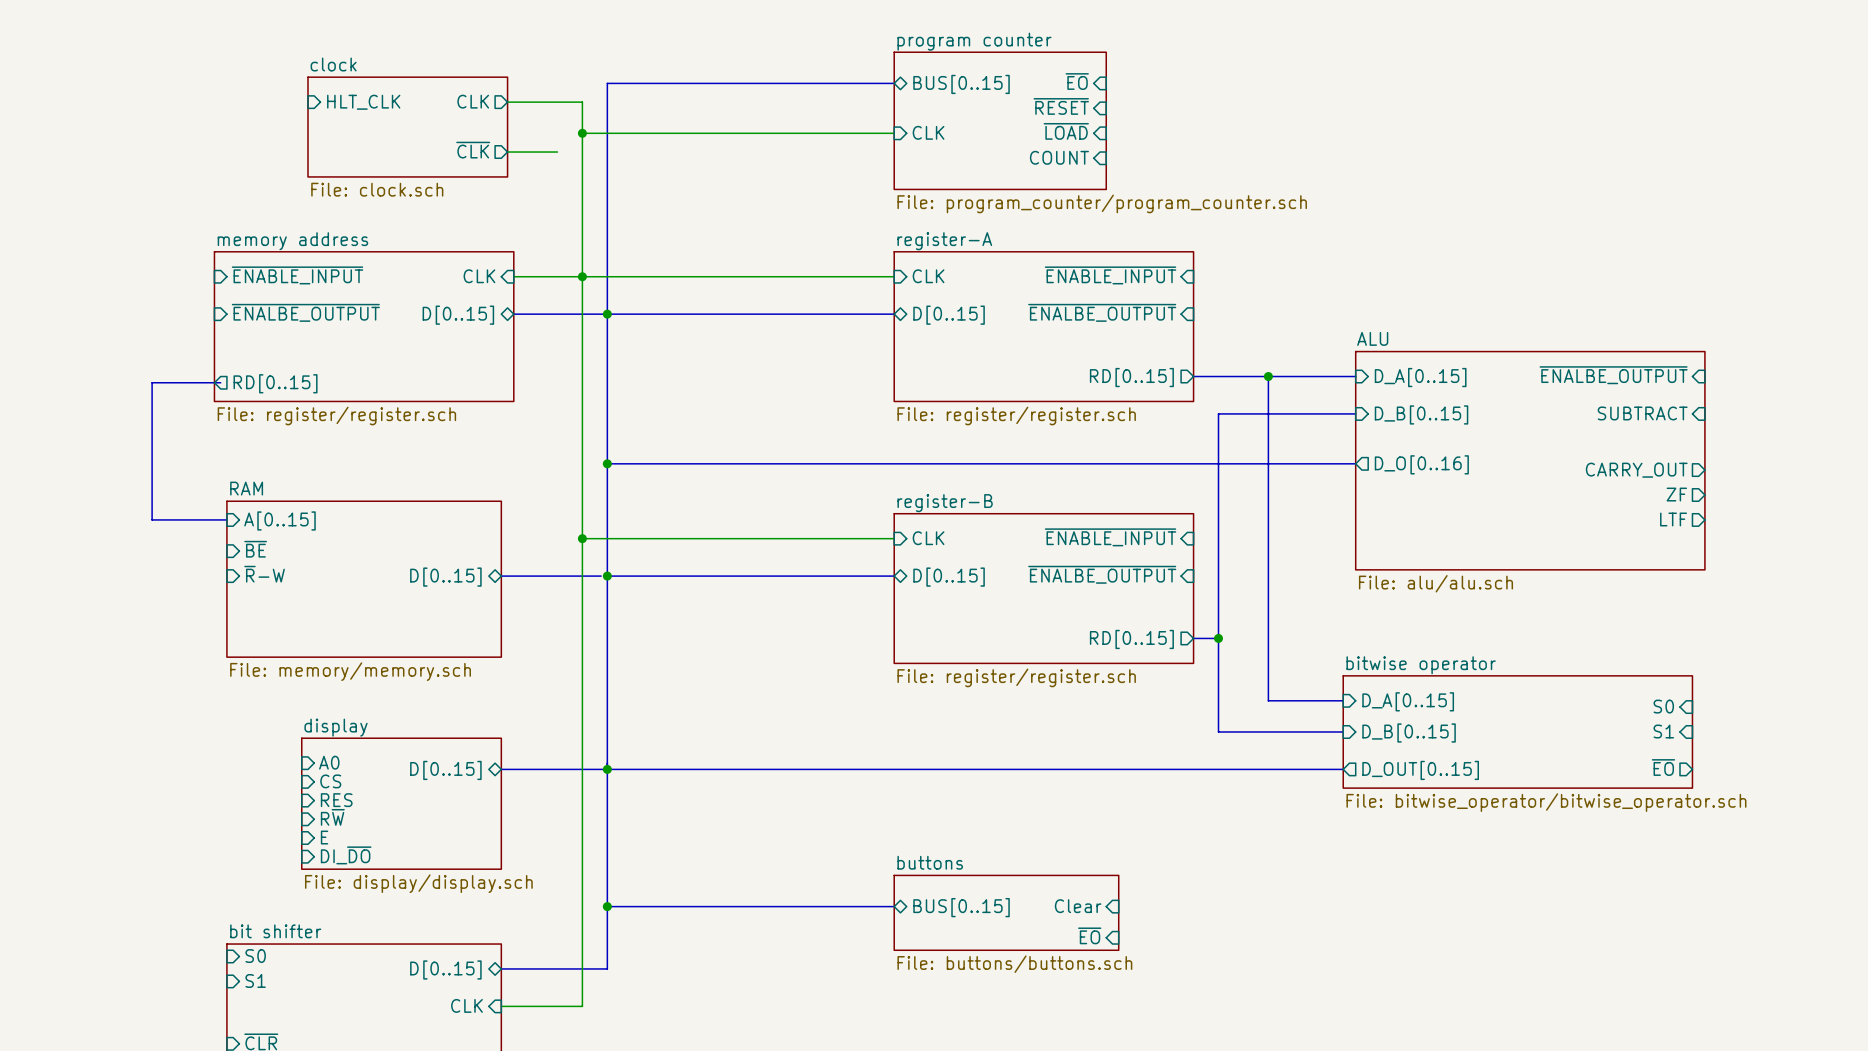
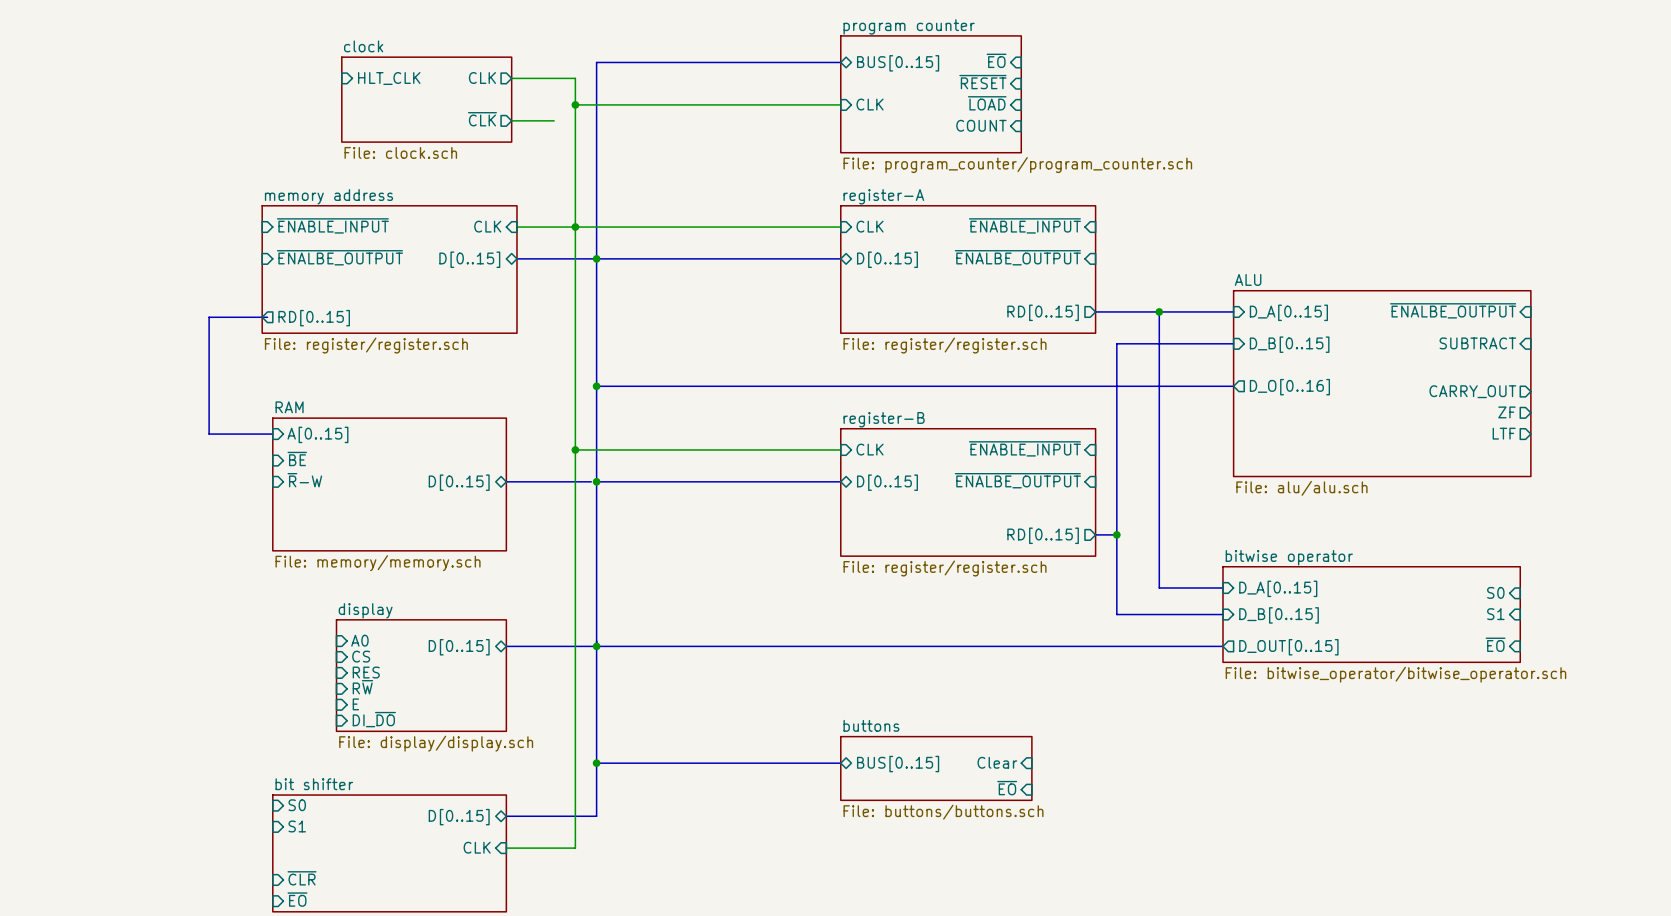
sheet pin shape: output (1663, 767) -> input (1495, 644)

